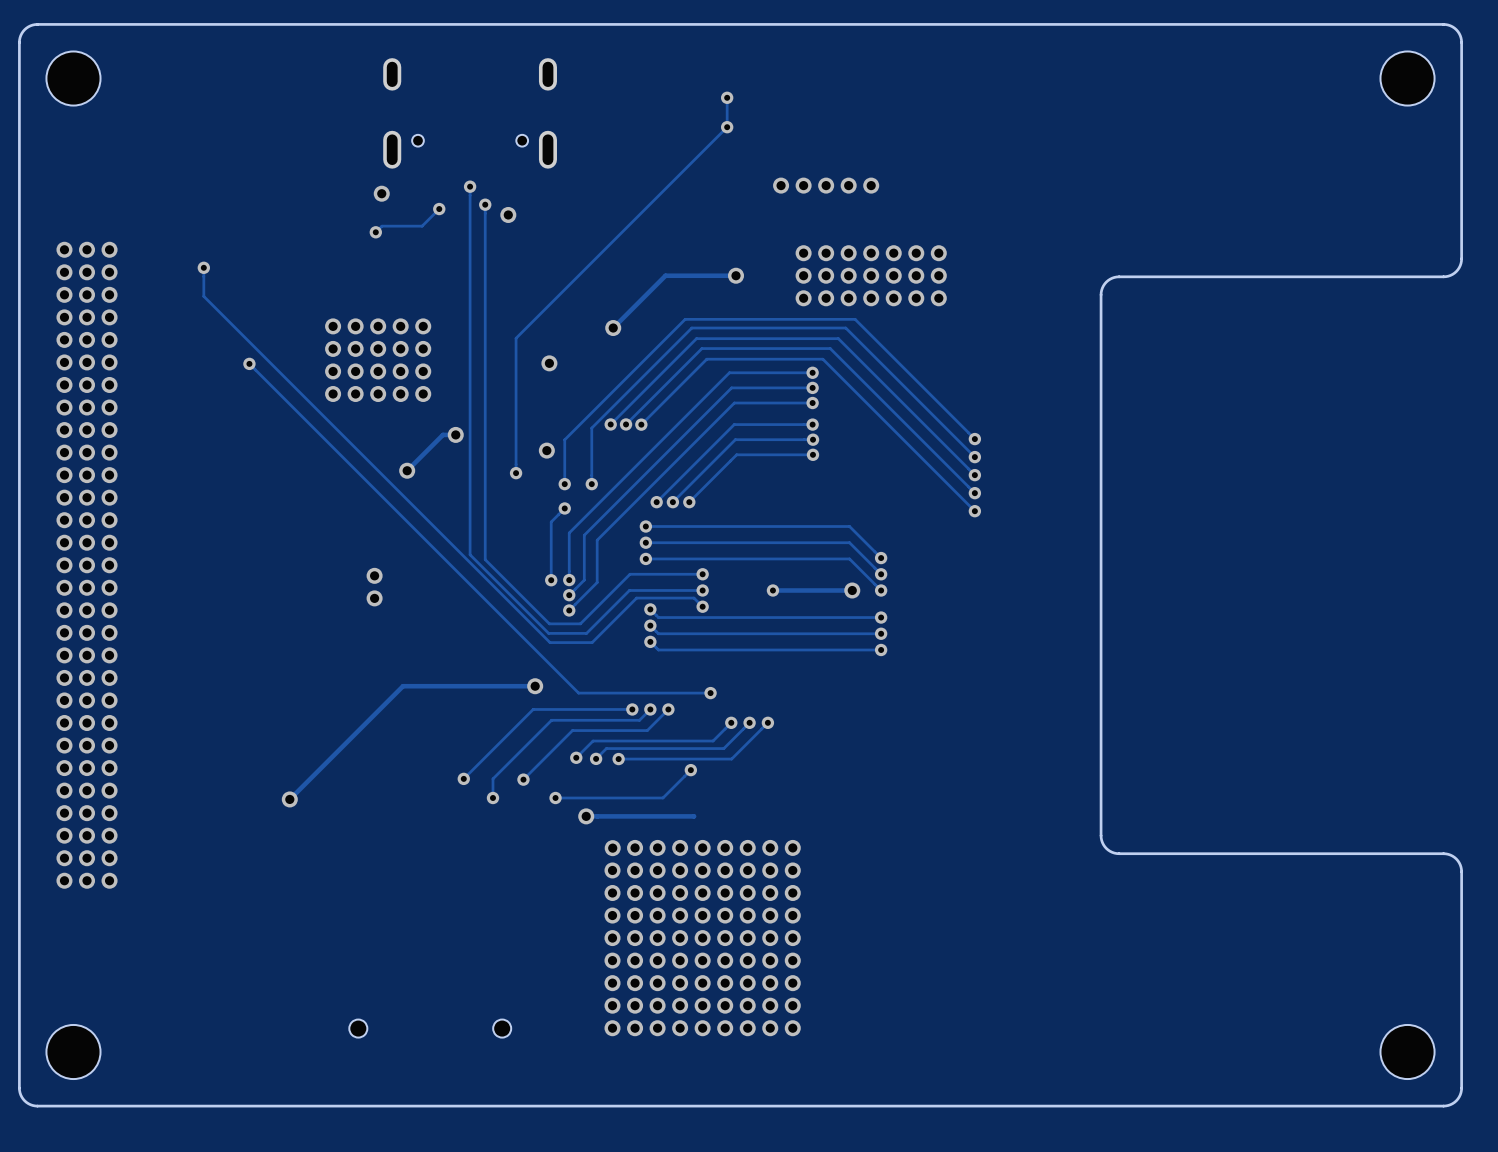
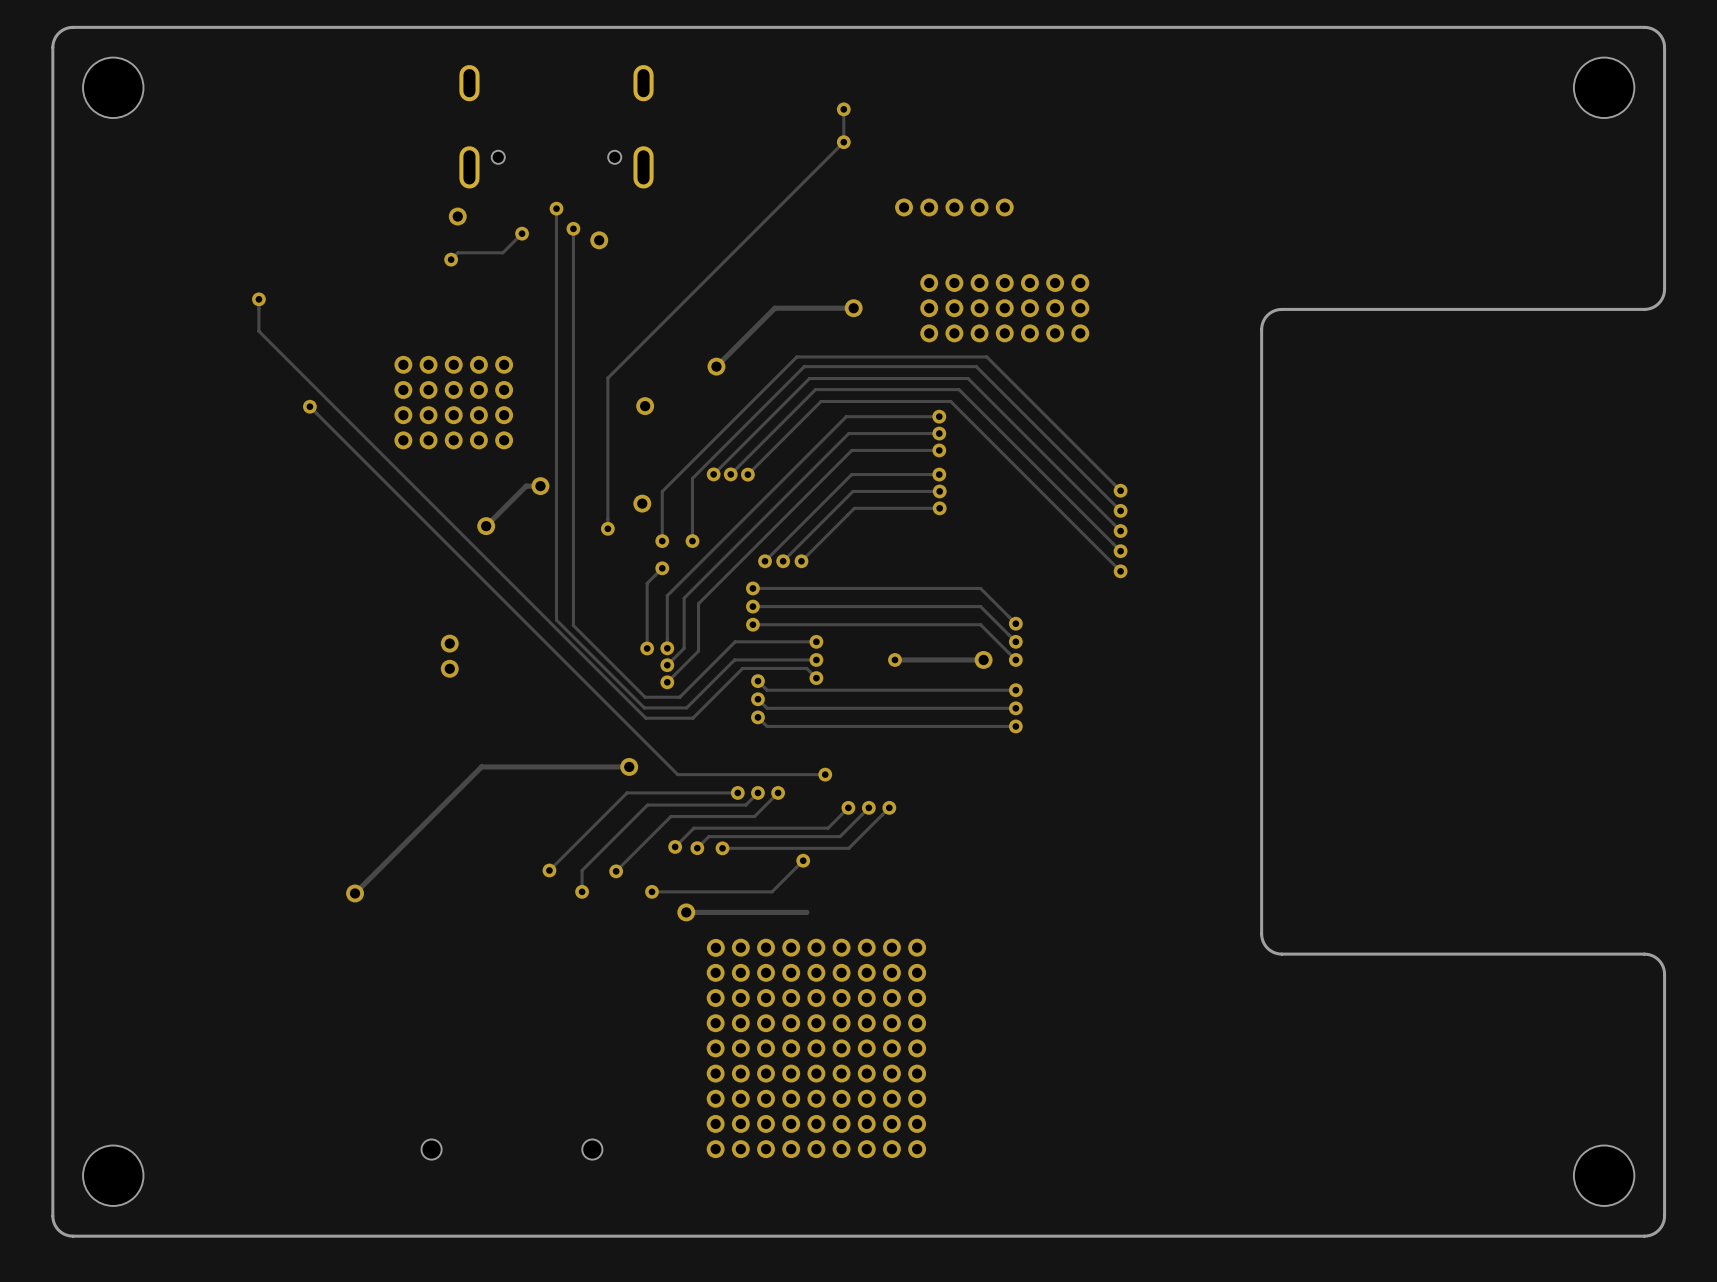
via: (64, 249) -> none
via: (87, 249) -> none
via: (109, 249) -> none
via: (64, 272) -> none
via: (87, 272) -> none
via: (109, 272) -> none
via: (64, 294) -> none
via: (87, 294) -> none
via: (109, 294) -> none
via: (64, 317) -> none
via: (87, 317) -> none
via: (109, 317) -> none
via: (64, 339) -> none
via: (87, 339) -> none
via: (109, 339) -> none
via: (64, 362) -> none
via: (87, 362) -> none
via: (109, 362) -> none
via: (64, 384) -> none
via: (87, 384) -> none
via: (109, 384) -> none
via: (64, 407) -> none
via: (87, 407) -> none
via: (109, 407) -> none
via: (64, 430) -> none
via: (87, 430) -> none
via: (109, 430) -> none
via: (64, 452) -> none
via: (87, 452) -> none
via: (109, 452) -> none
via: (64, 475) -> none
via: (87, 475) -> none
via: (109, 475) -> none
via: (64, 497) -> none
via: (87, 497) -> none
via: (109, 497) -> none
via: (64, 520) -> none
via: (87, 520) -> none
via: (109, 520) -> none
via: (64, 542) -> none
via: (87, 542) -> none
via: (109, 542) -> none
via: (64, 565) -> none
via: (87, 565) -> none
via: (109, 565) -> none
via: (64, 587) -> none
via: (87, 587) -> none
via: (109, 587) -> none
via: (64, 610) -> none
via: (87, 610) -> none
via: (109, 610) -> none
via: (64, 632) -> none
via: (87, 632) -> none
via: (109, 632) -> none
via: (64, 655) -> none
via: (87, 655) -> none
via: (109, 655) -> none
via: (64, 677) -> none
via: (87, 677) -> none
via: (109, 677) -> none
via: (64, 700) -> none
via: (87, 700) -> none
via: (109, 700) -> none
via: (64, 723) -> none
via: (87, 723) -> none
via: (109, 723) -> none
via: (64, 745) -> none
via: (87, 745) -> none
via: (109, 745) -> none
via: (64, 768) -> none
via: (87, 768) -> none
via: (109, 768) -> none
via: (64, 790) -> none
via: (87, 790) -> none
via: (109, 790) -> none
via: (64, 813) -> none
via: (87, 813) -> none
via: (109, 813) -> none
via: (64, 835) -> none
via: (87, 835) -> none
via: (109, 835) -> none
via: (64, 858) -> none
via: (87, 858) -> none
via: (109, 858) -> none
via: (64, 880) -> none
via: (87, 880) -> none
via: (109, 880) -> none

